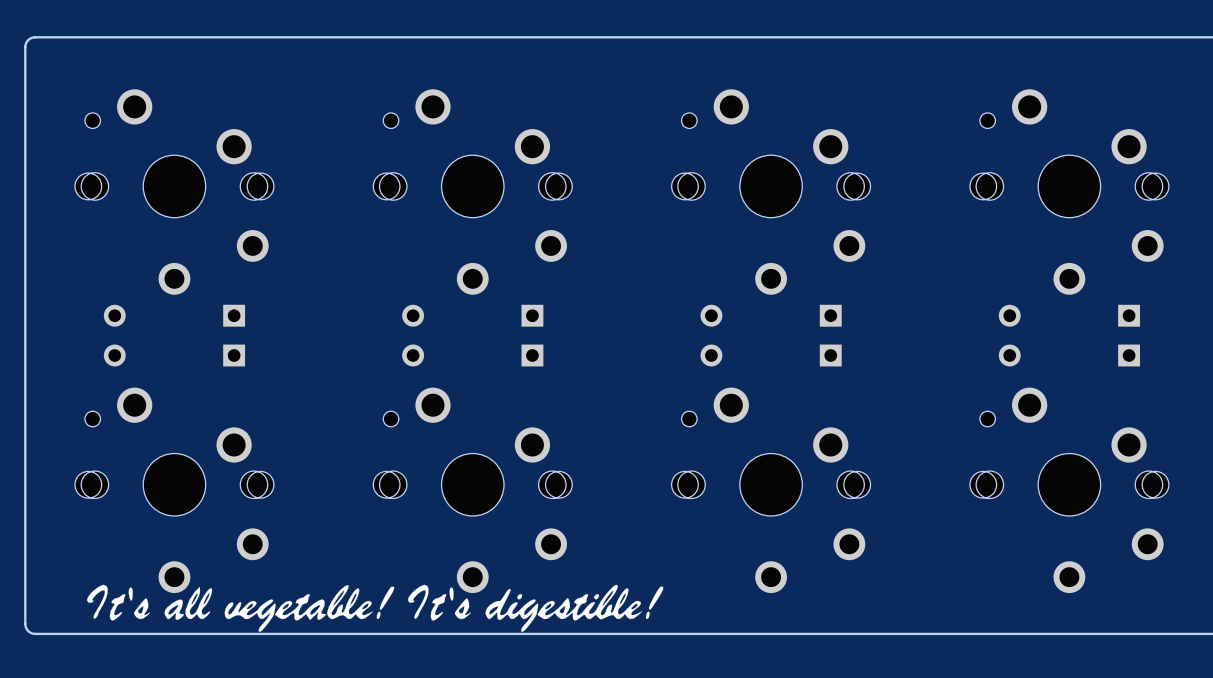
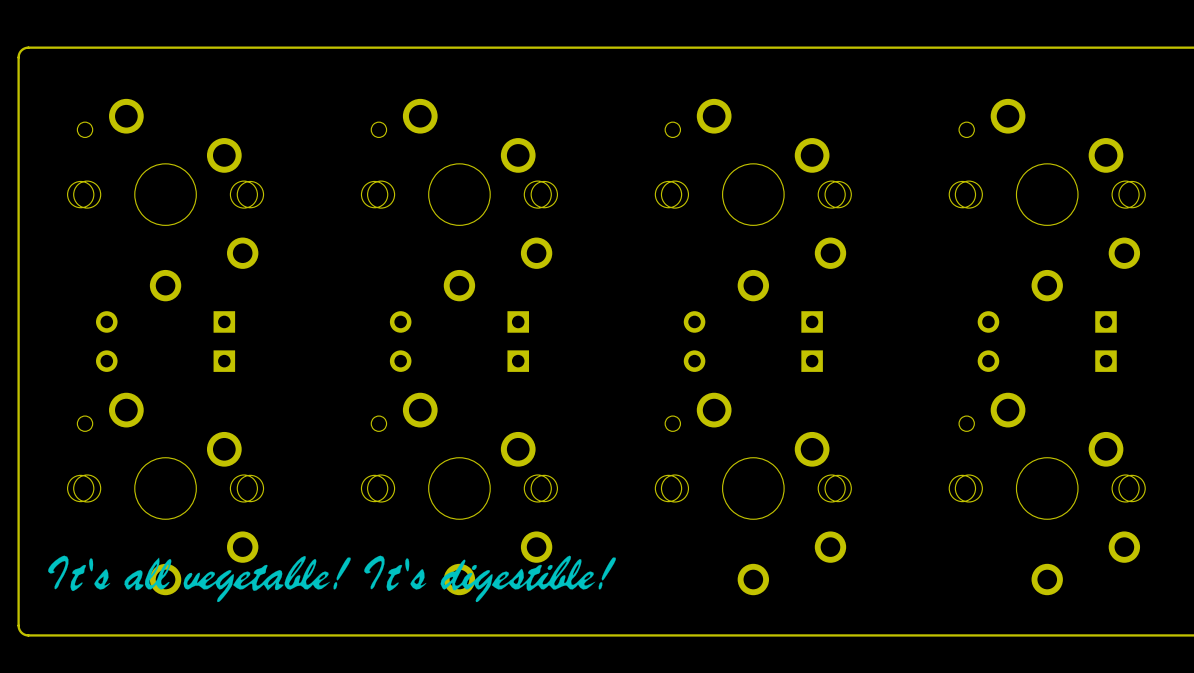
drawing position: (375, 608) -> (331, 578)

